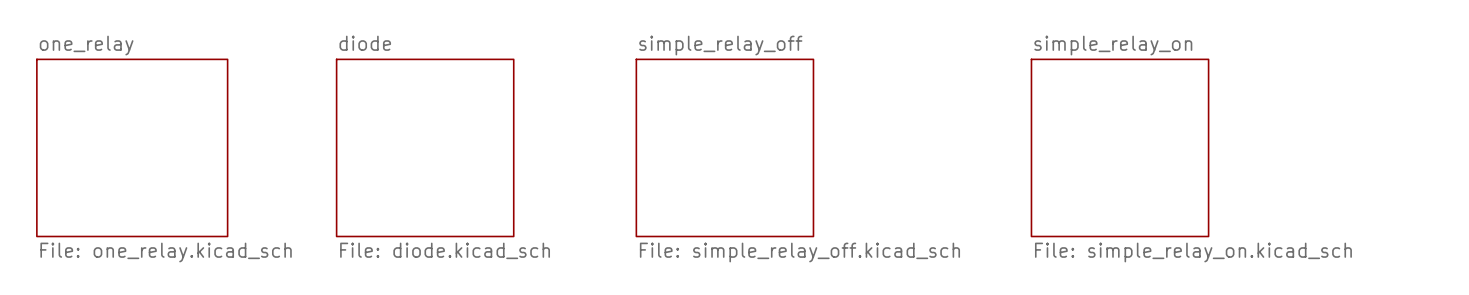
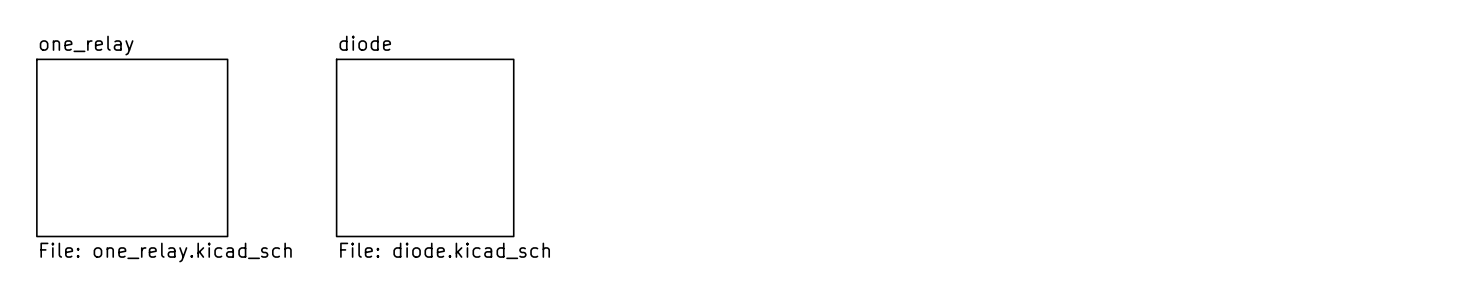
sheet simple_relay_off: File: simple_relay_off.kicad_sch (724, 147) -> none
sheet simple_relay_on: File: simple_relay_on.kicad_sch (1120, 147) -> none

